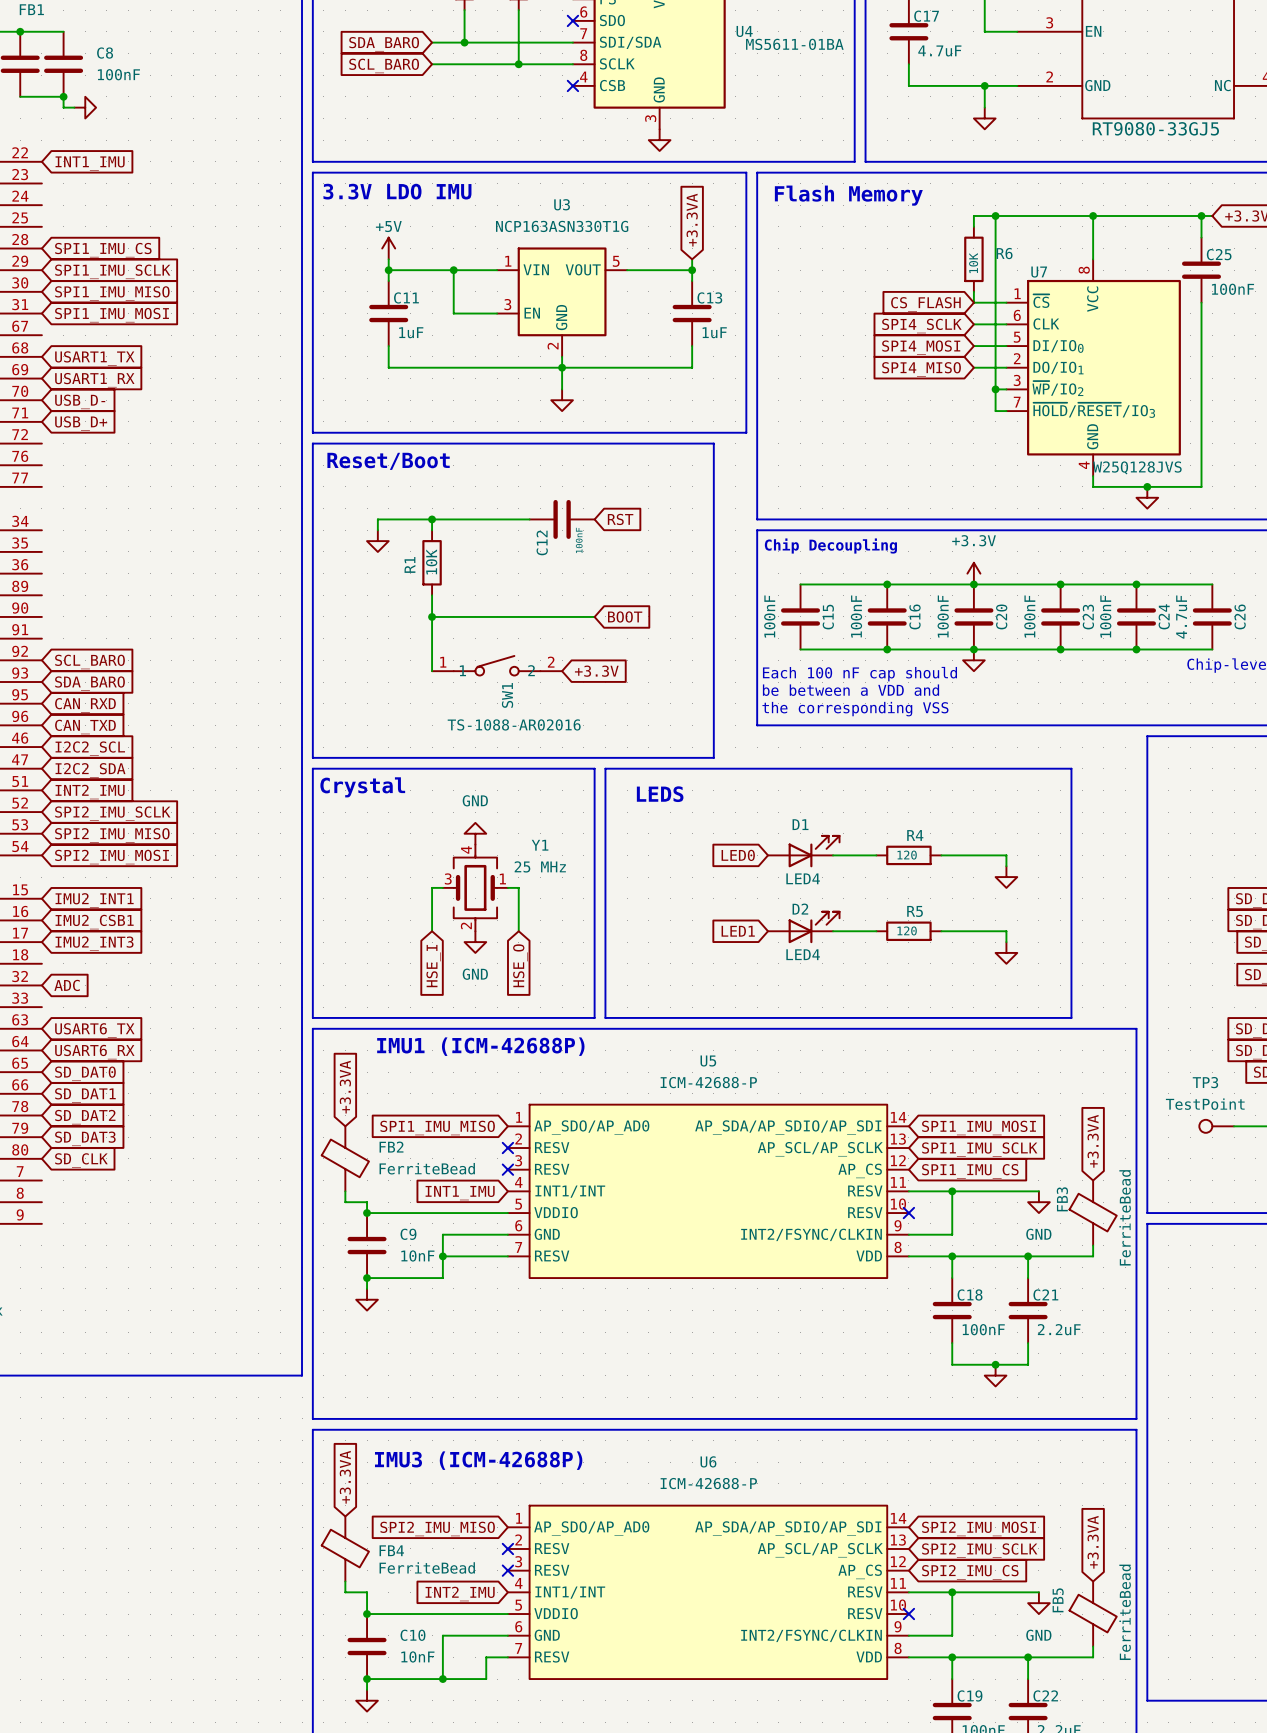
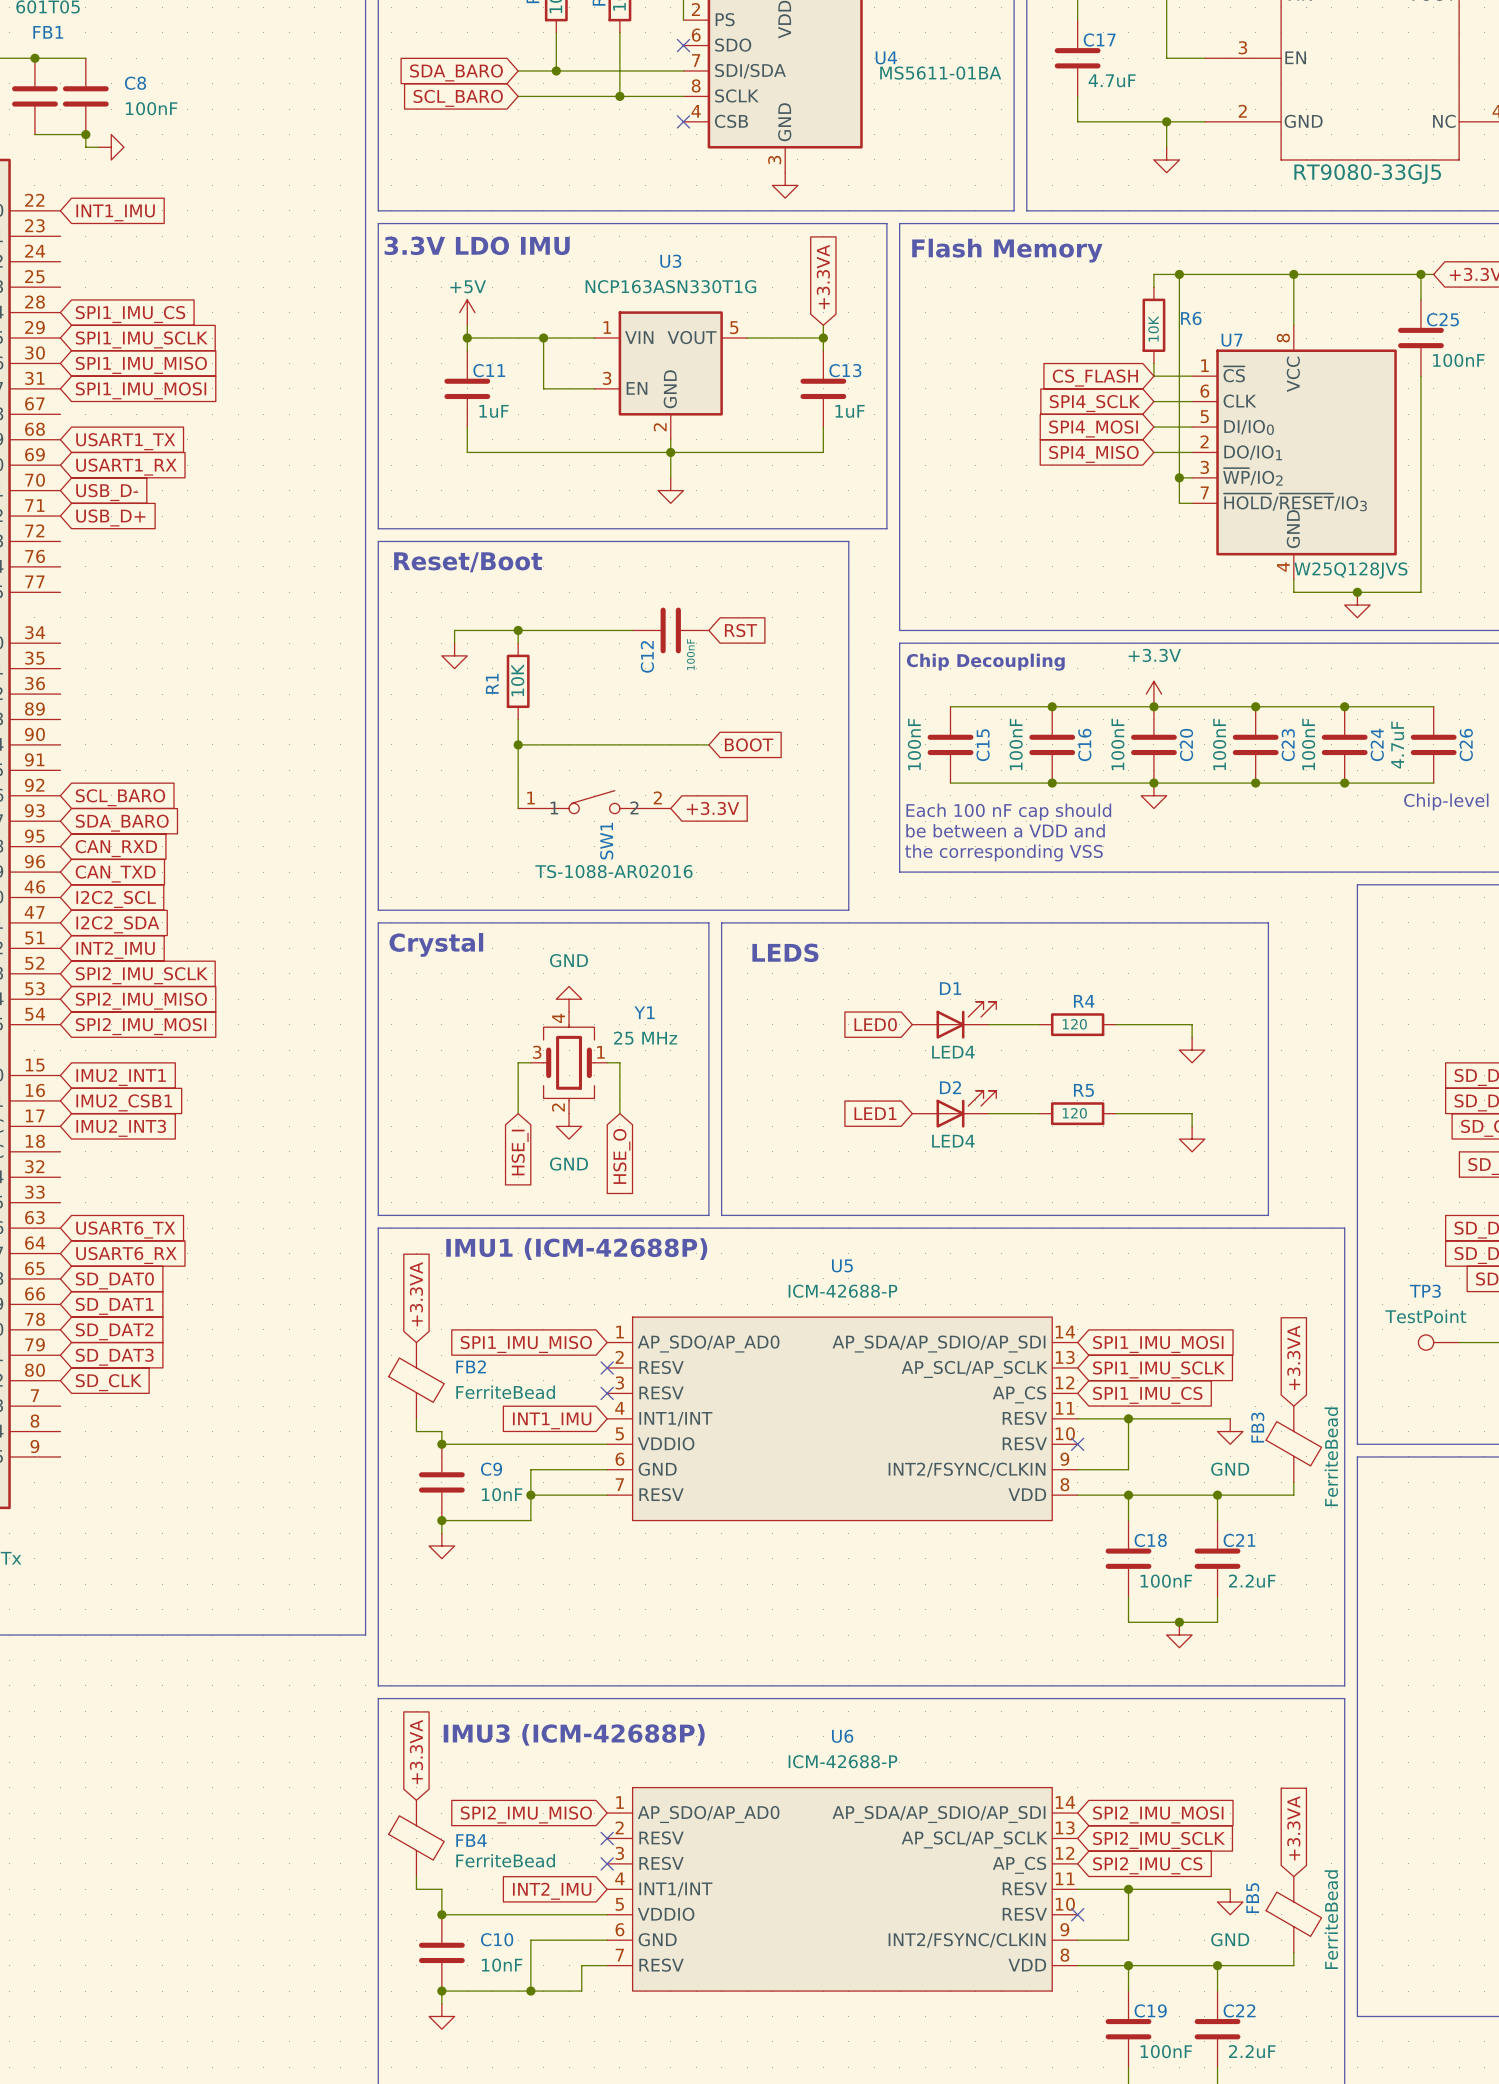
global label: ADC (67, 985) -> none

